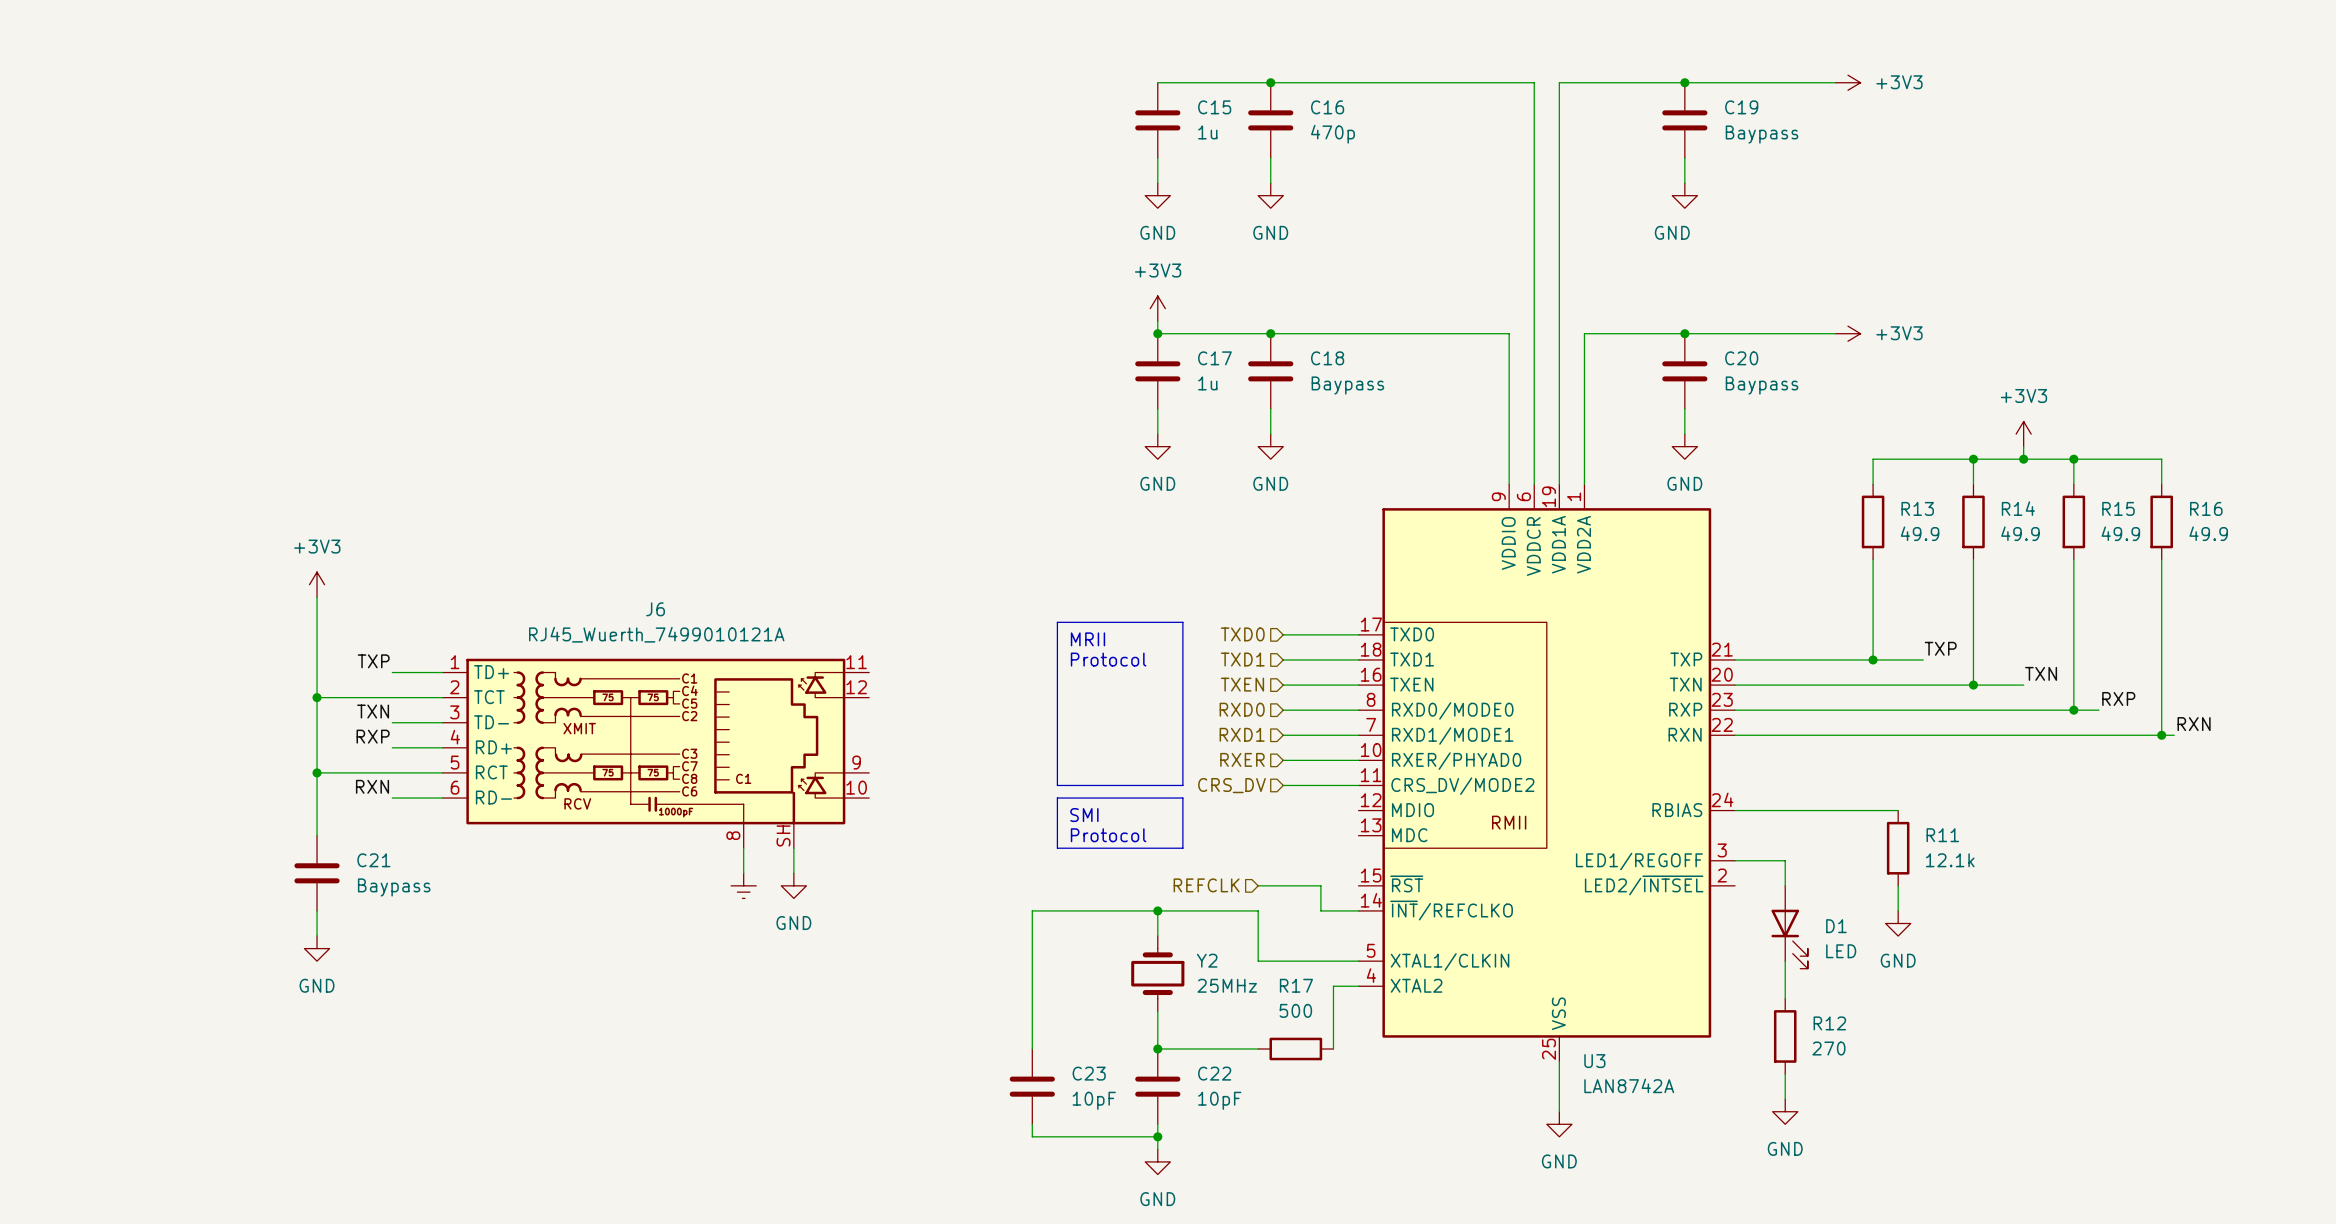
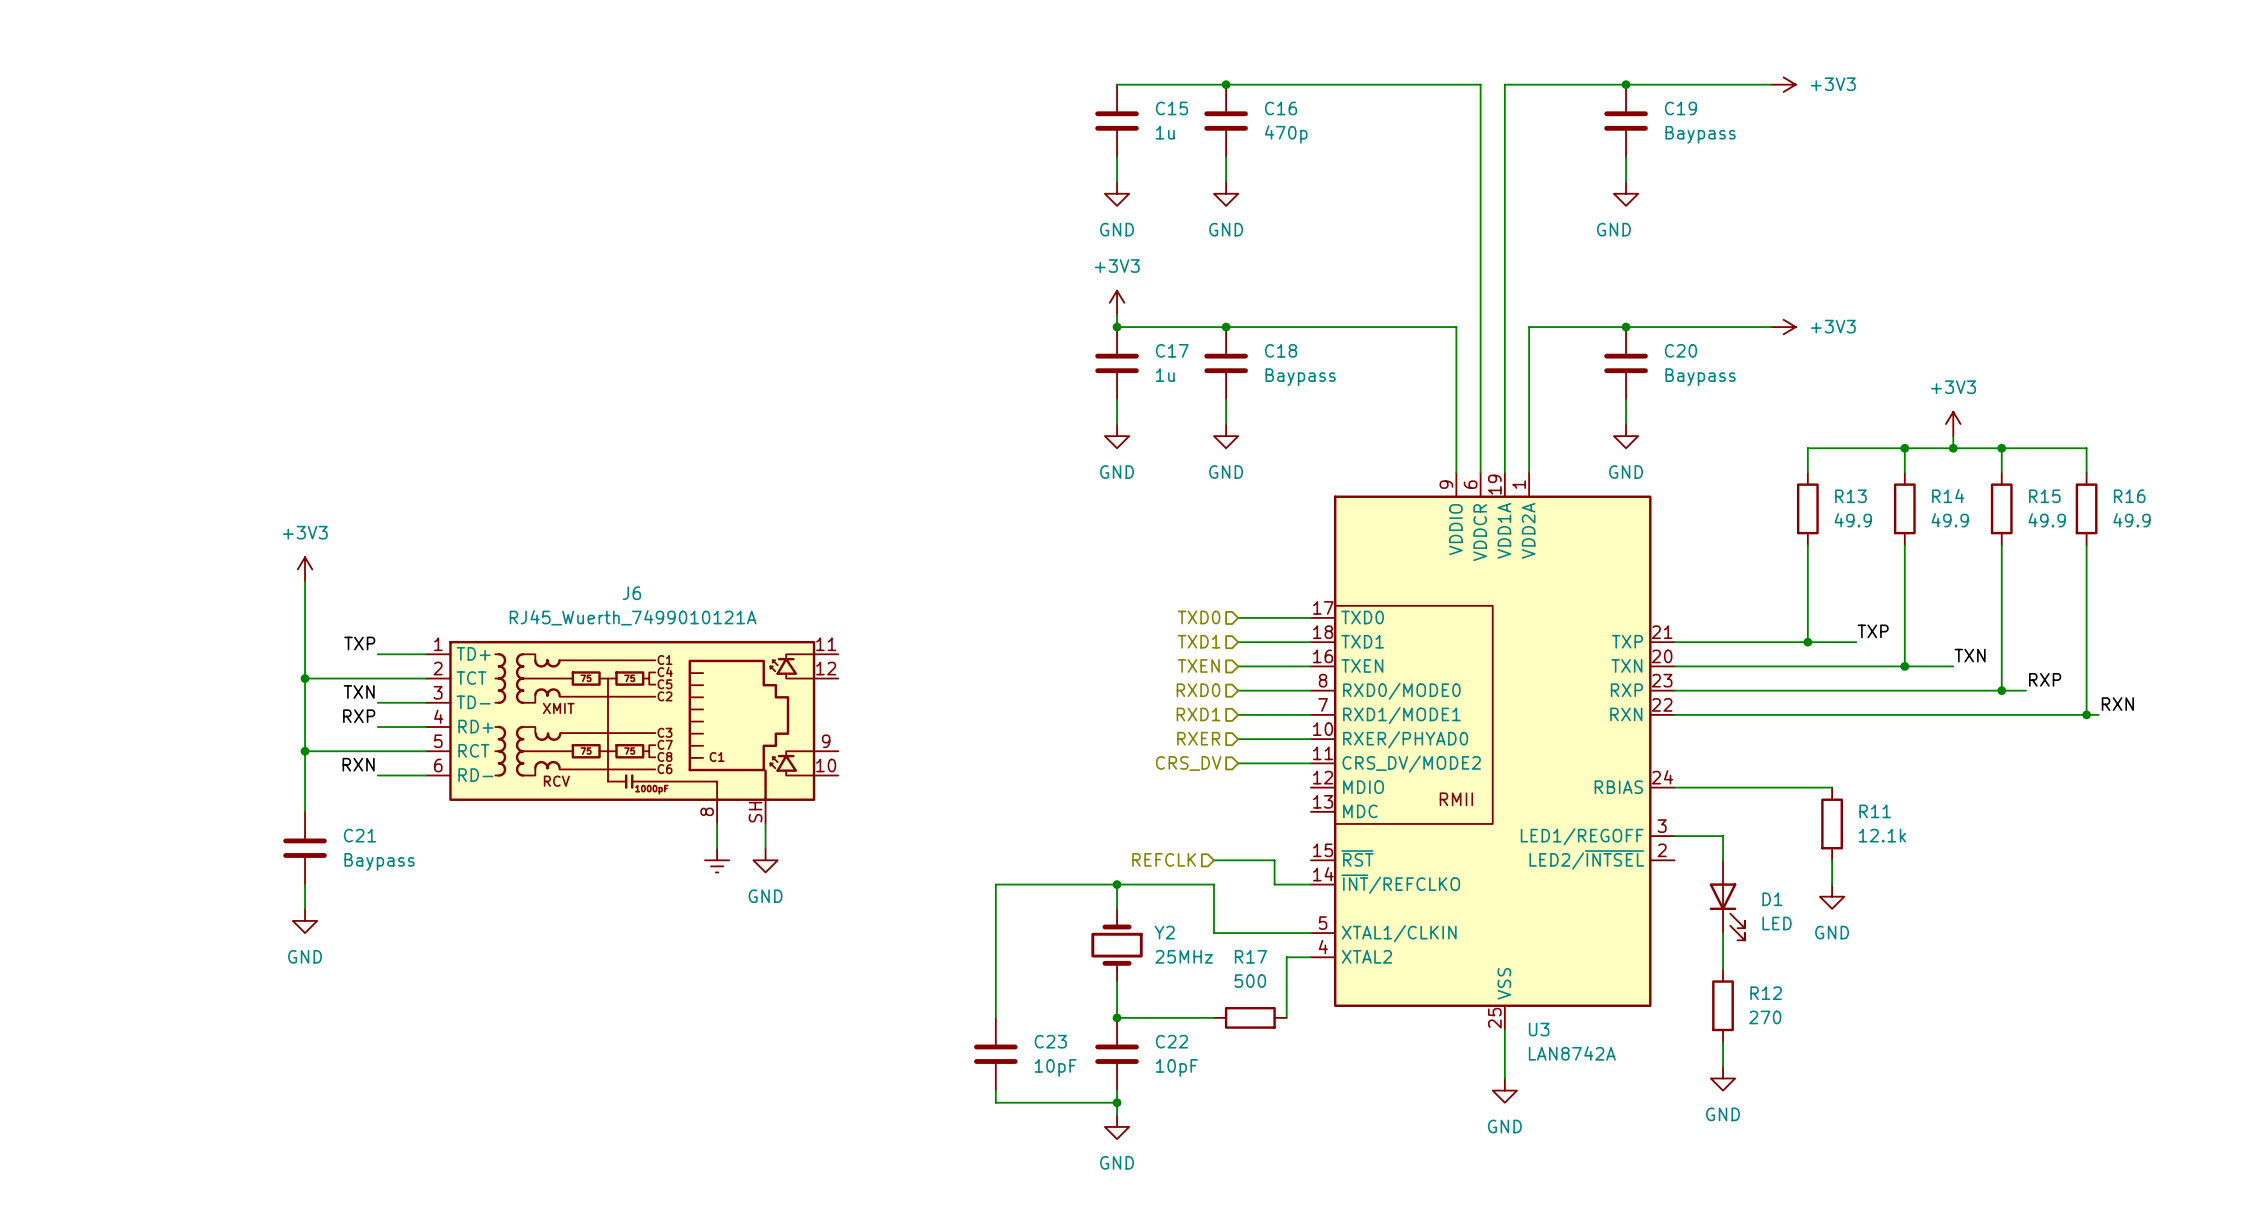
line: (1057, 622) (1182, 622) (1182, 785) (1057, 785) (1057, 622) -> none
text: MRII (1087, 639) -> none
text: Protocol (1108, 659) -> none
line: (1057, 798) (1057, 848) (1182, 848) (1182, 798) (1057, 798) -> none
text: SMI (1084, 815) -> none
text: Protocol (1108, 835) -> none

